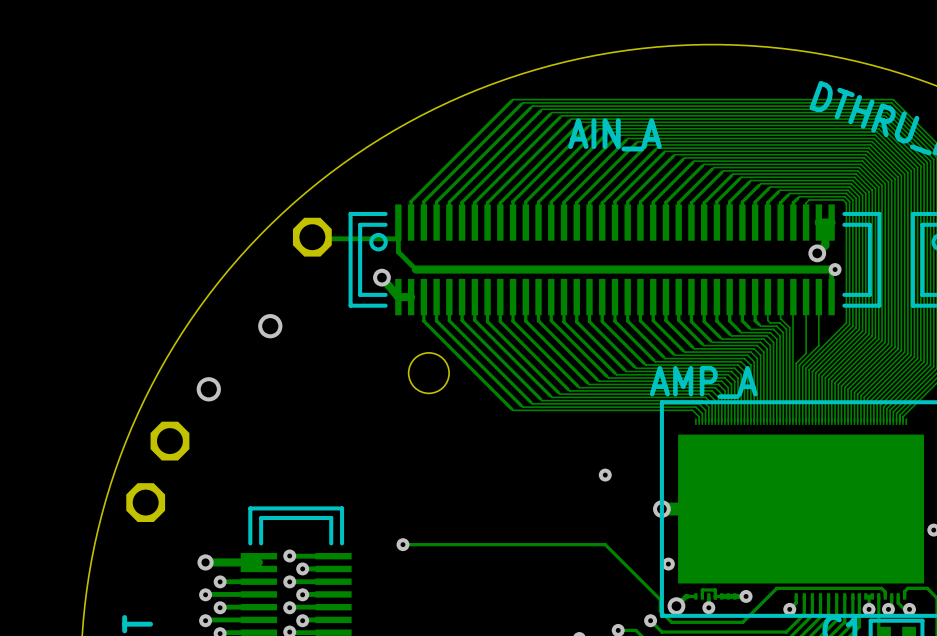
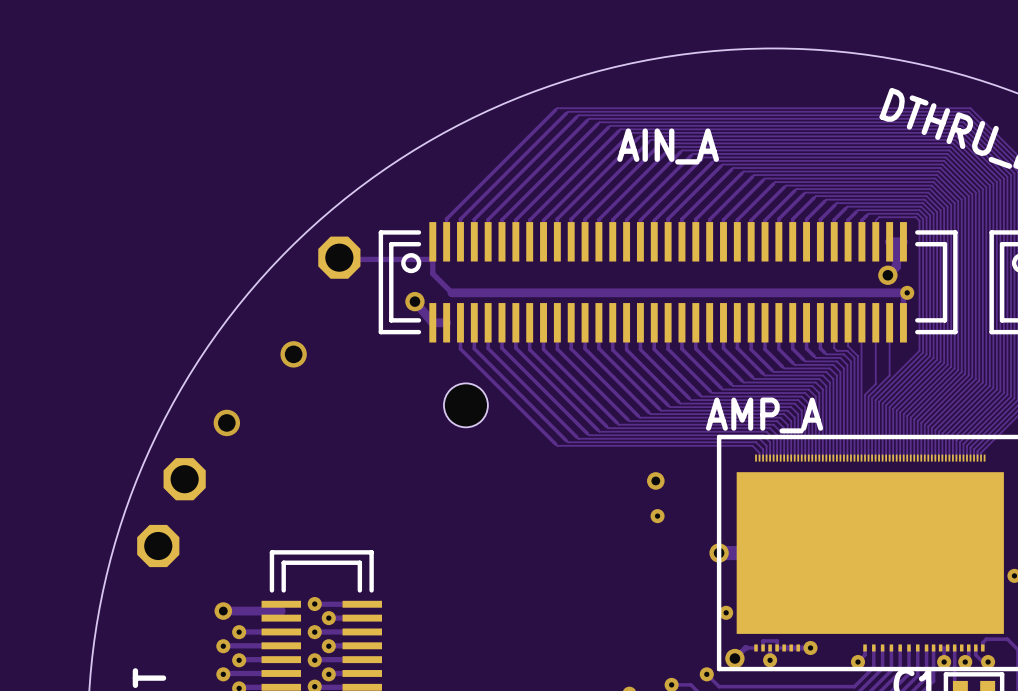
via: none -> (655, 480)
track: (402, 544) (605, 544) (660, 599) (660, 611) (671, 622) (742, 622) (776, 588) (881, 588) (885, 591) (885, 596) -> none
via: (402, 544) -> none

